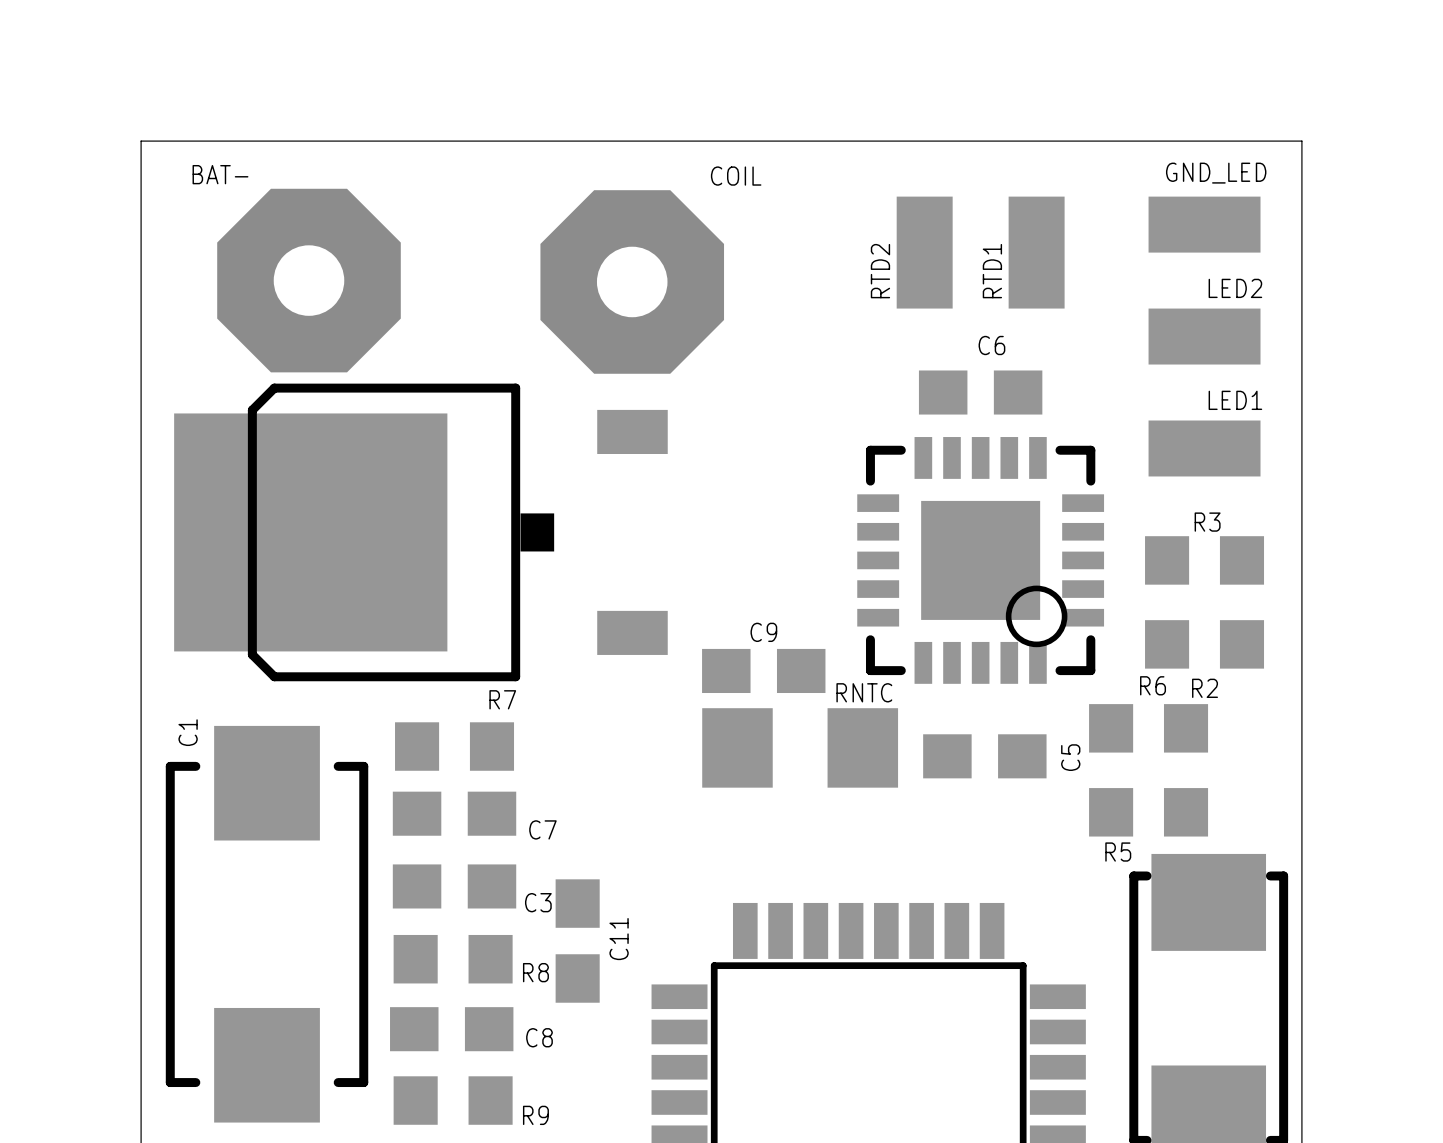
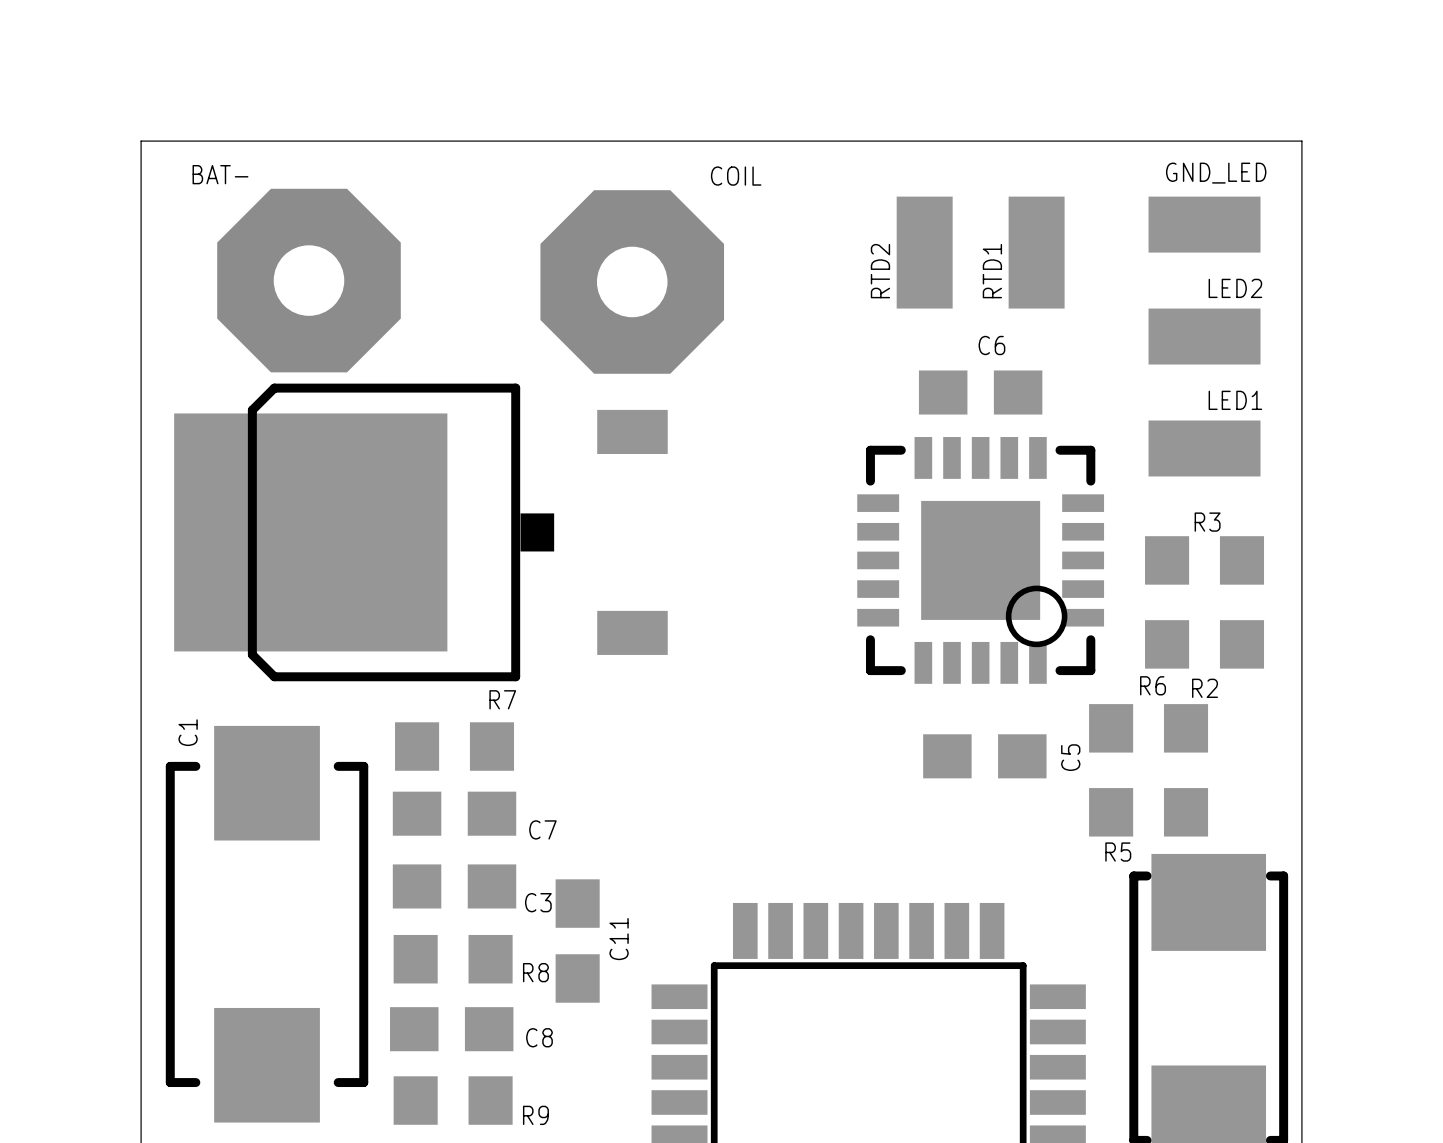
C9: (763, 670) -> none
RNTC: (800, 747) -> none

